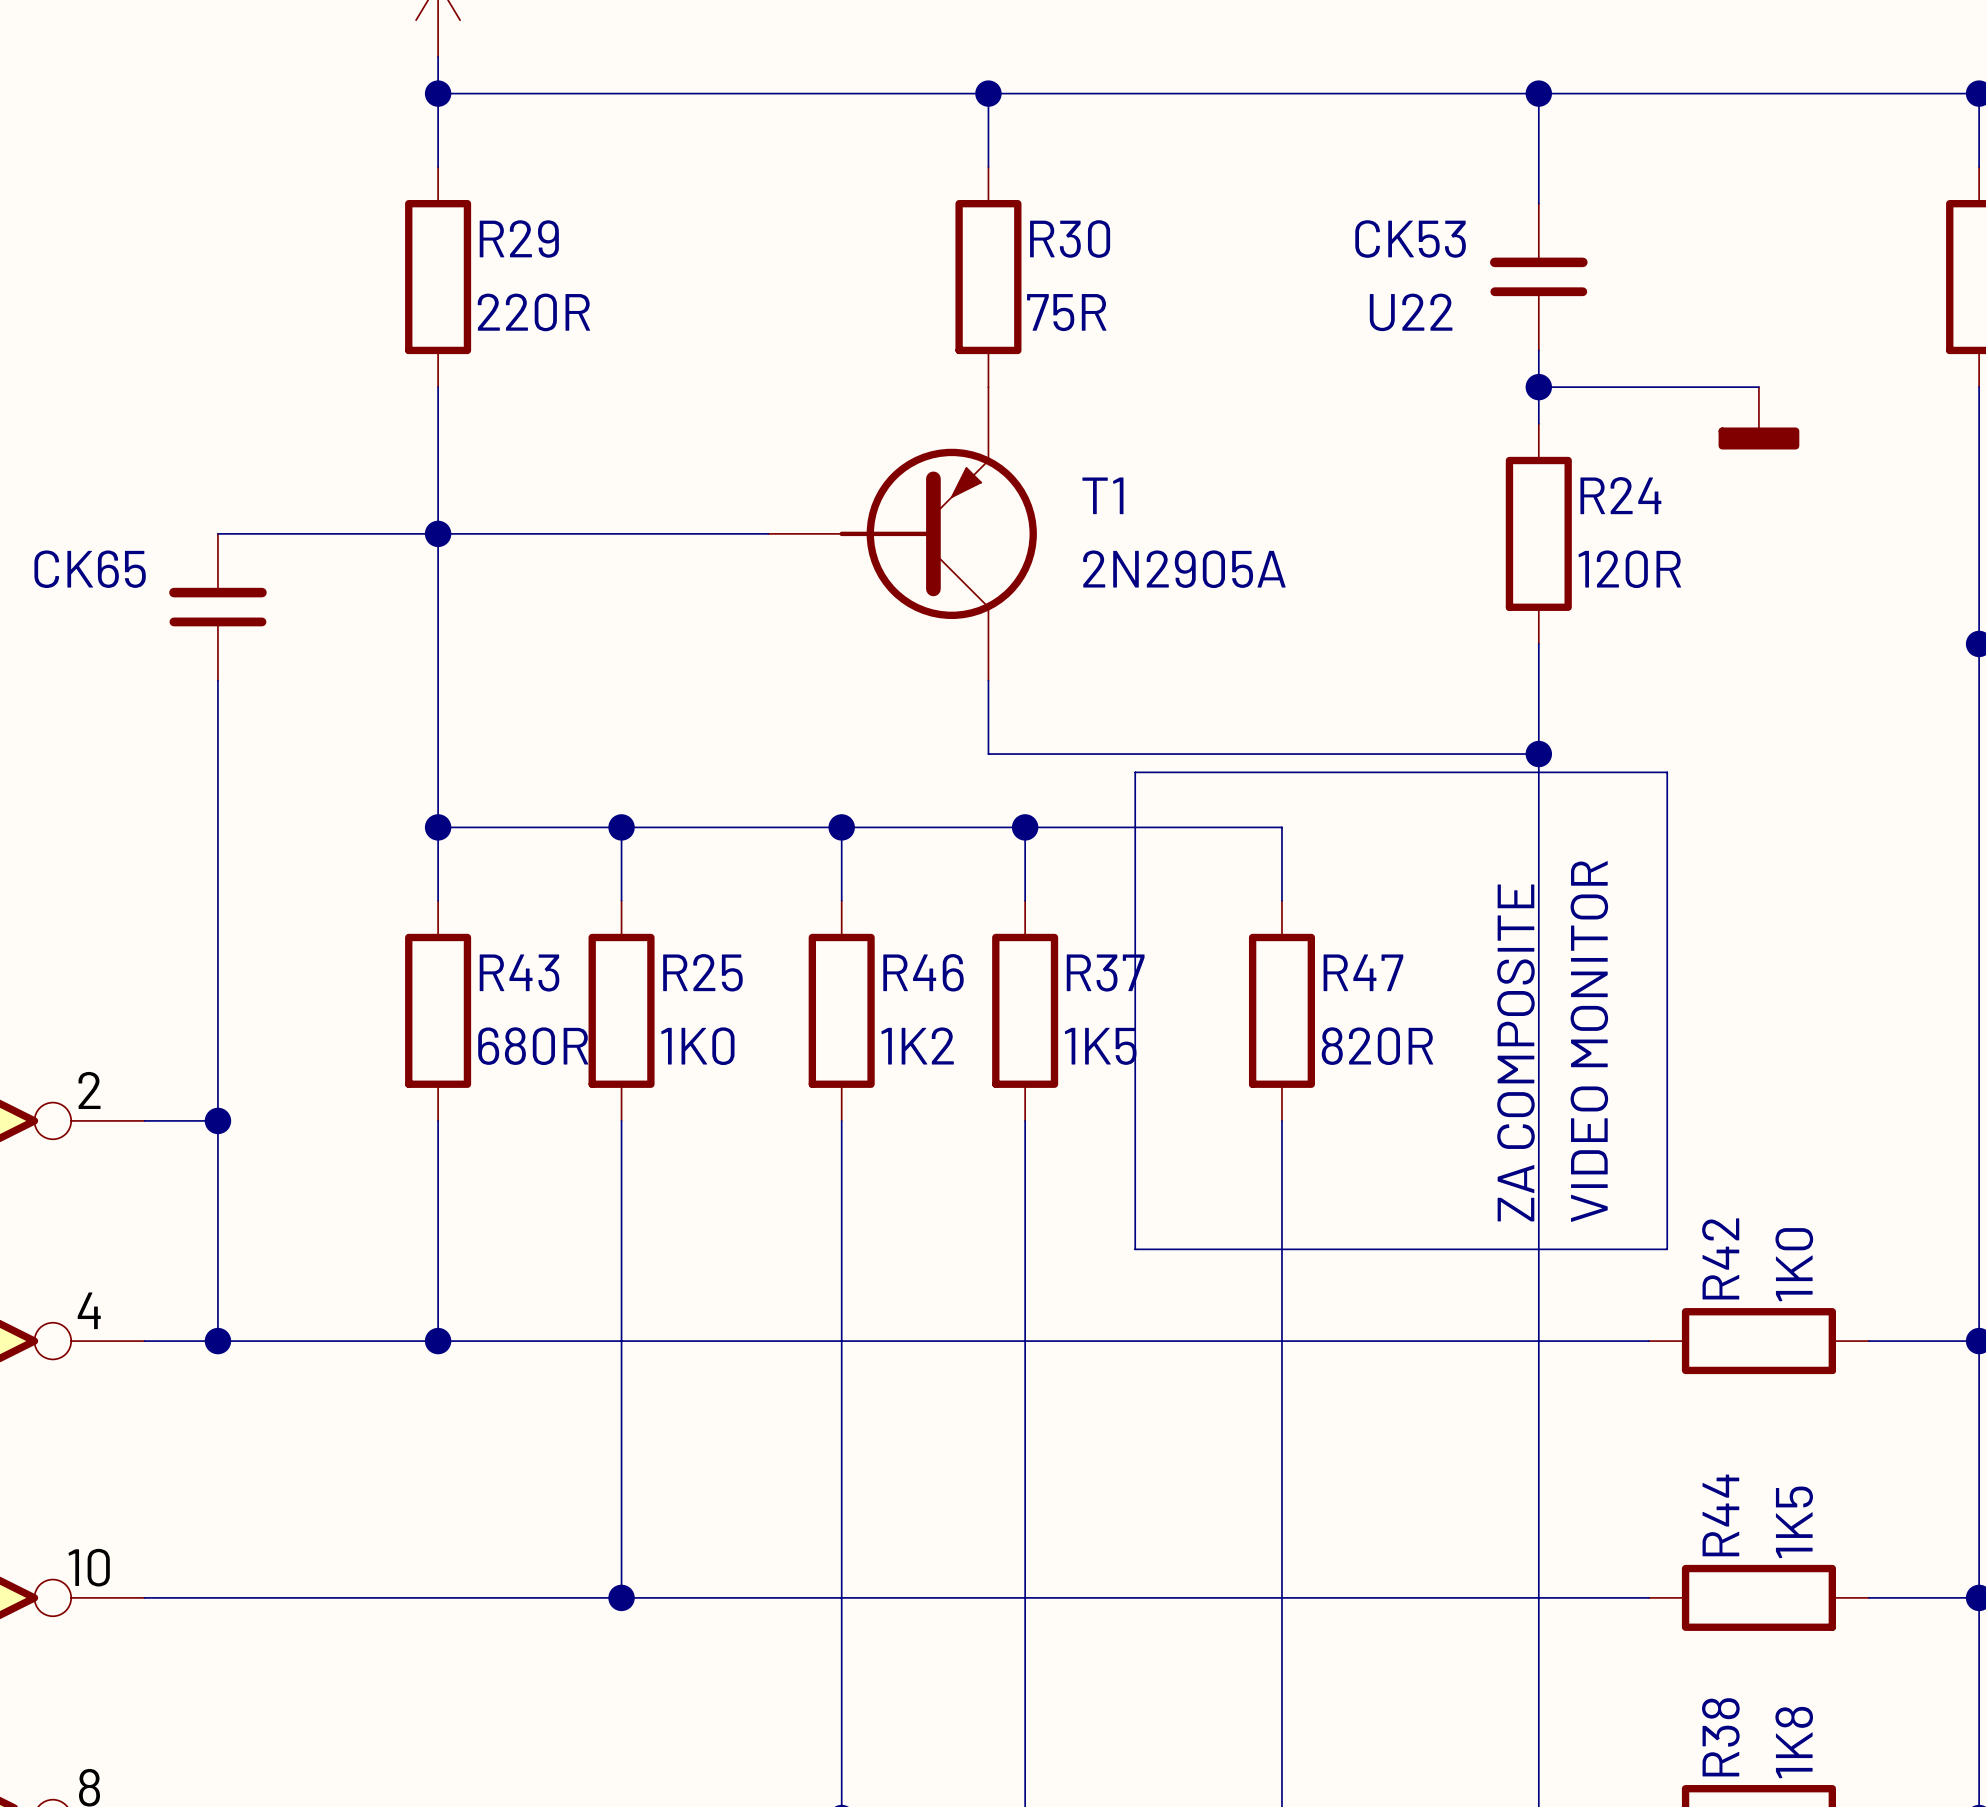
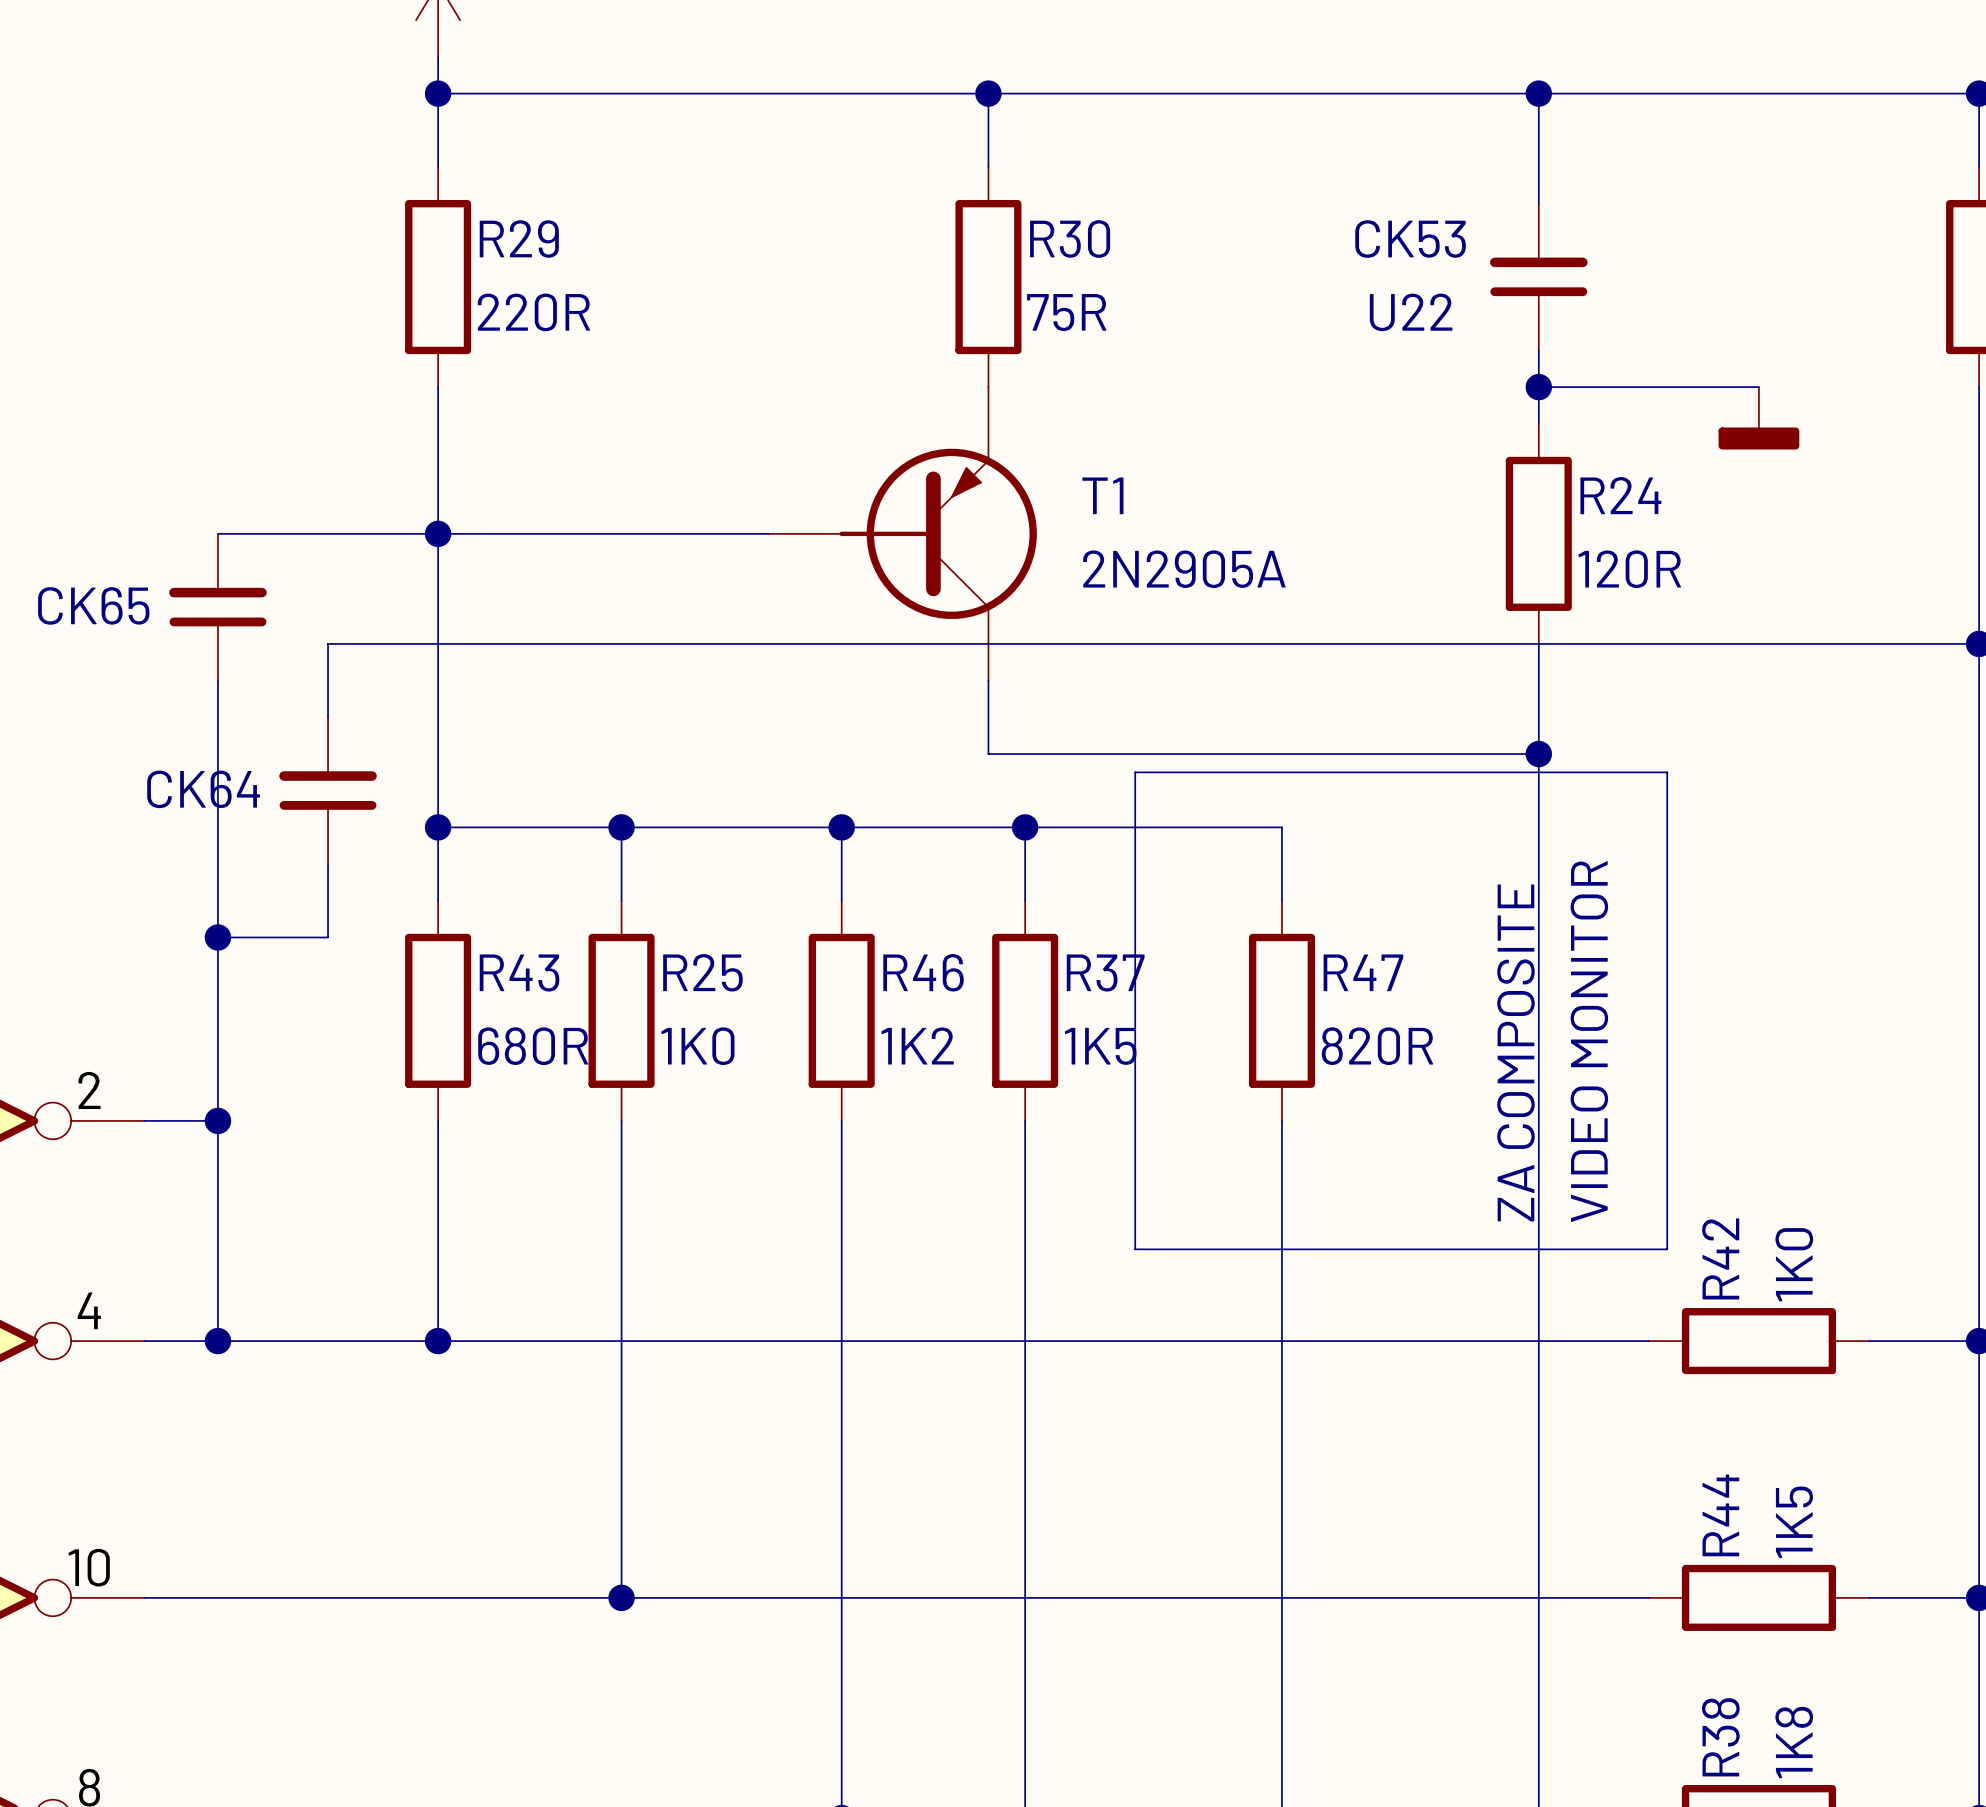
CK65 name position: CK65 (90, 569) -> CK65 (93, 605)
wire: none -> (1979, 643) (328, 643) (328, 717)
CK64: none -> (328, 790)
wire: none -> (328, 864) (328, 937) (217, 937)
junction: none -> (217, 937)

